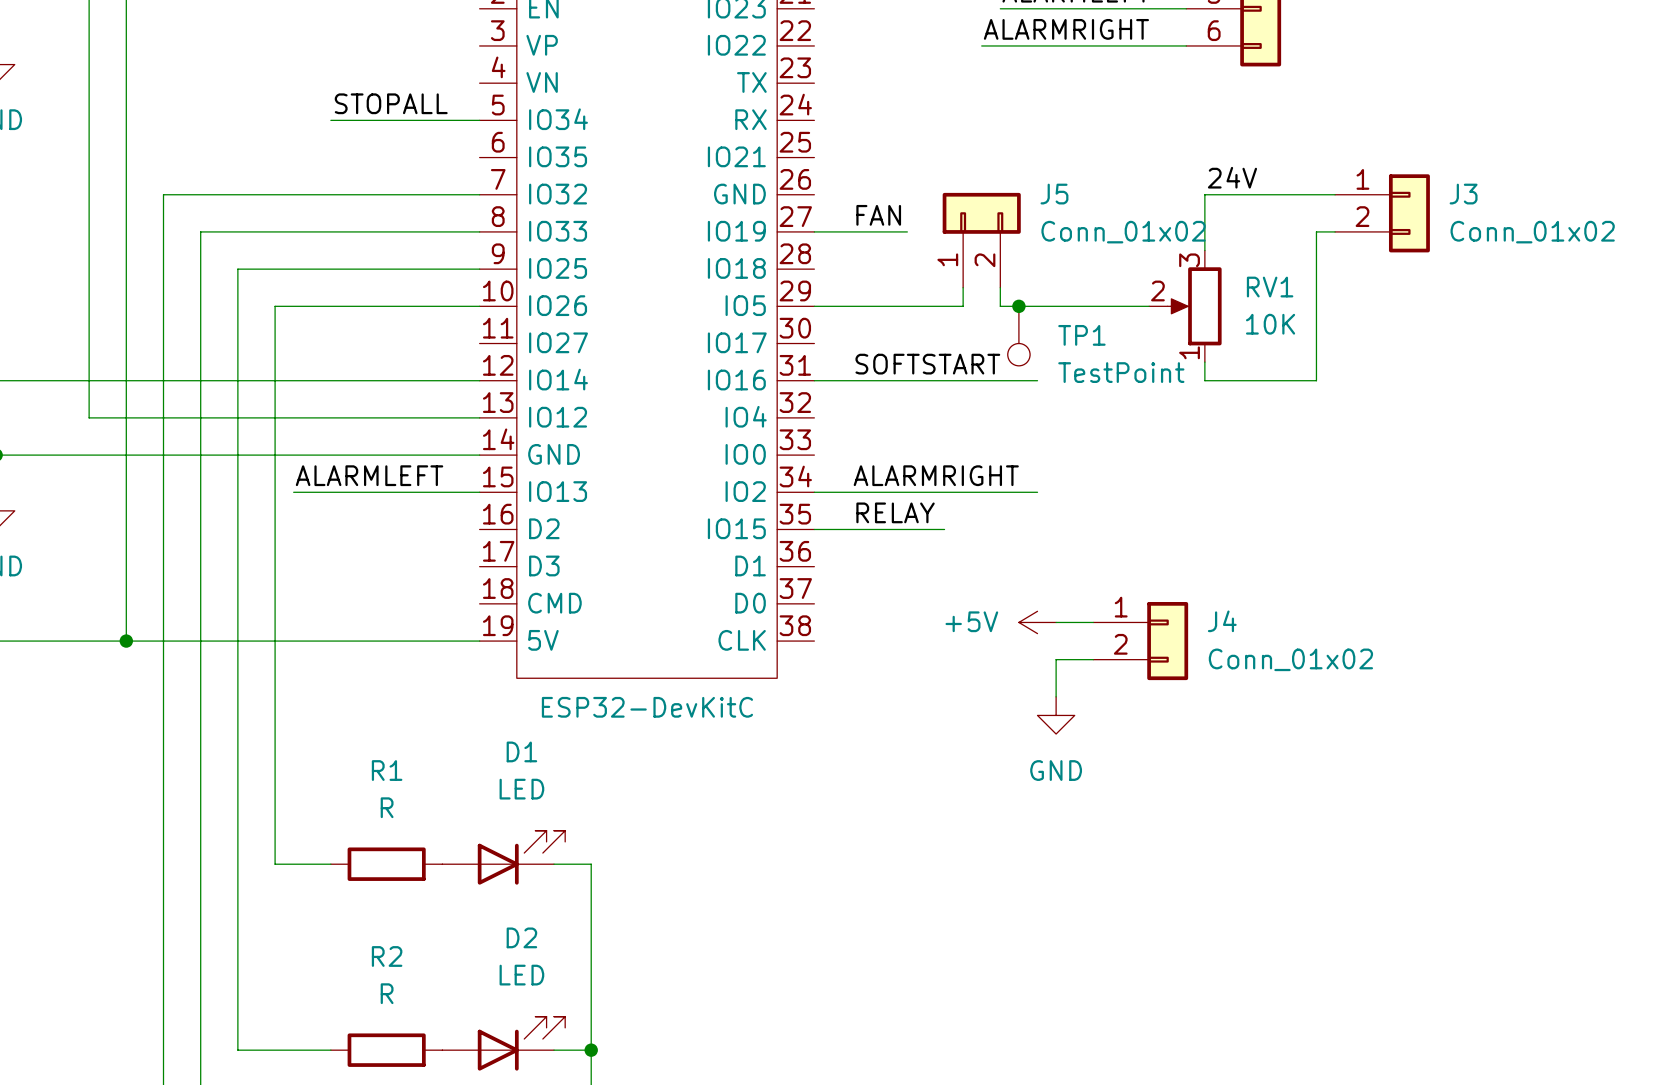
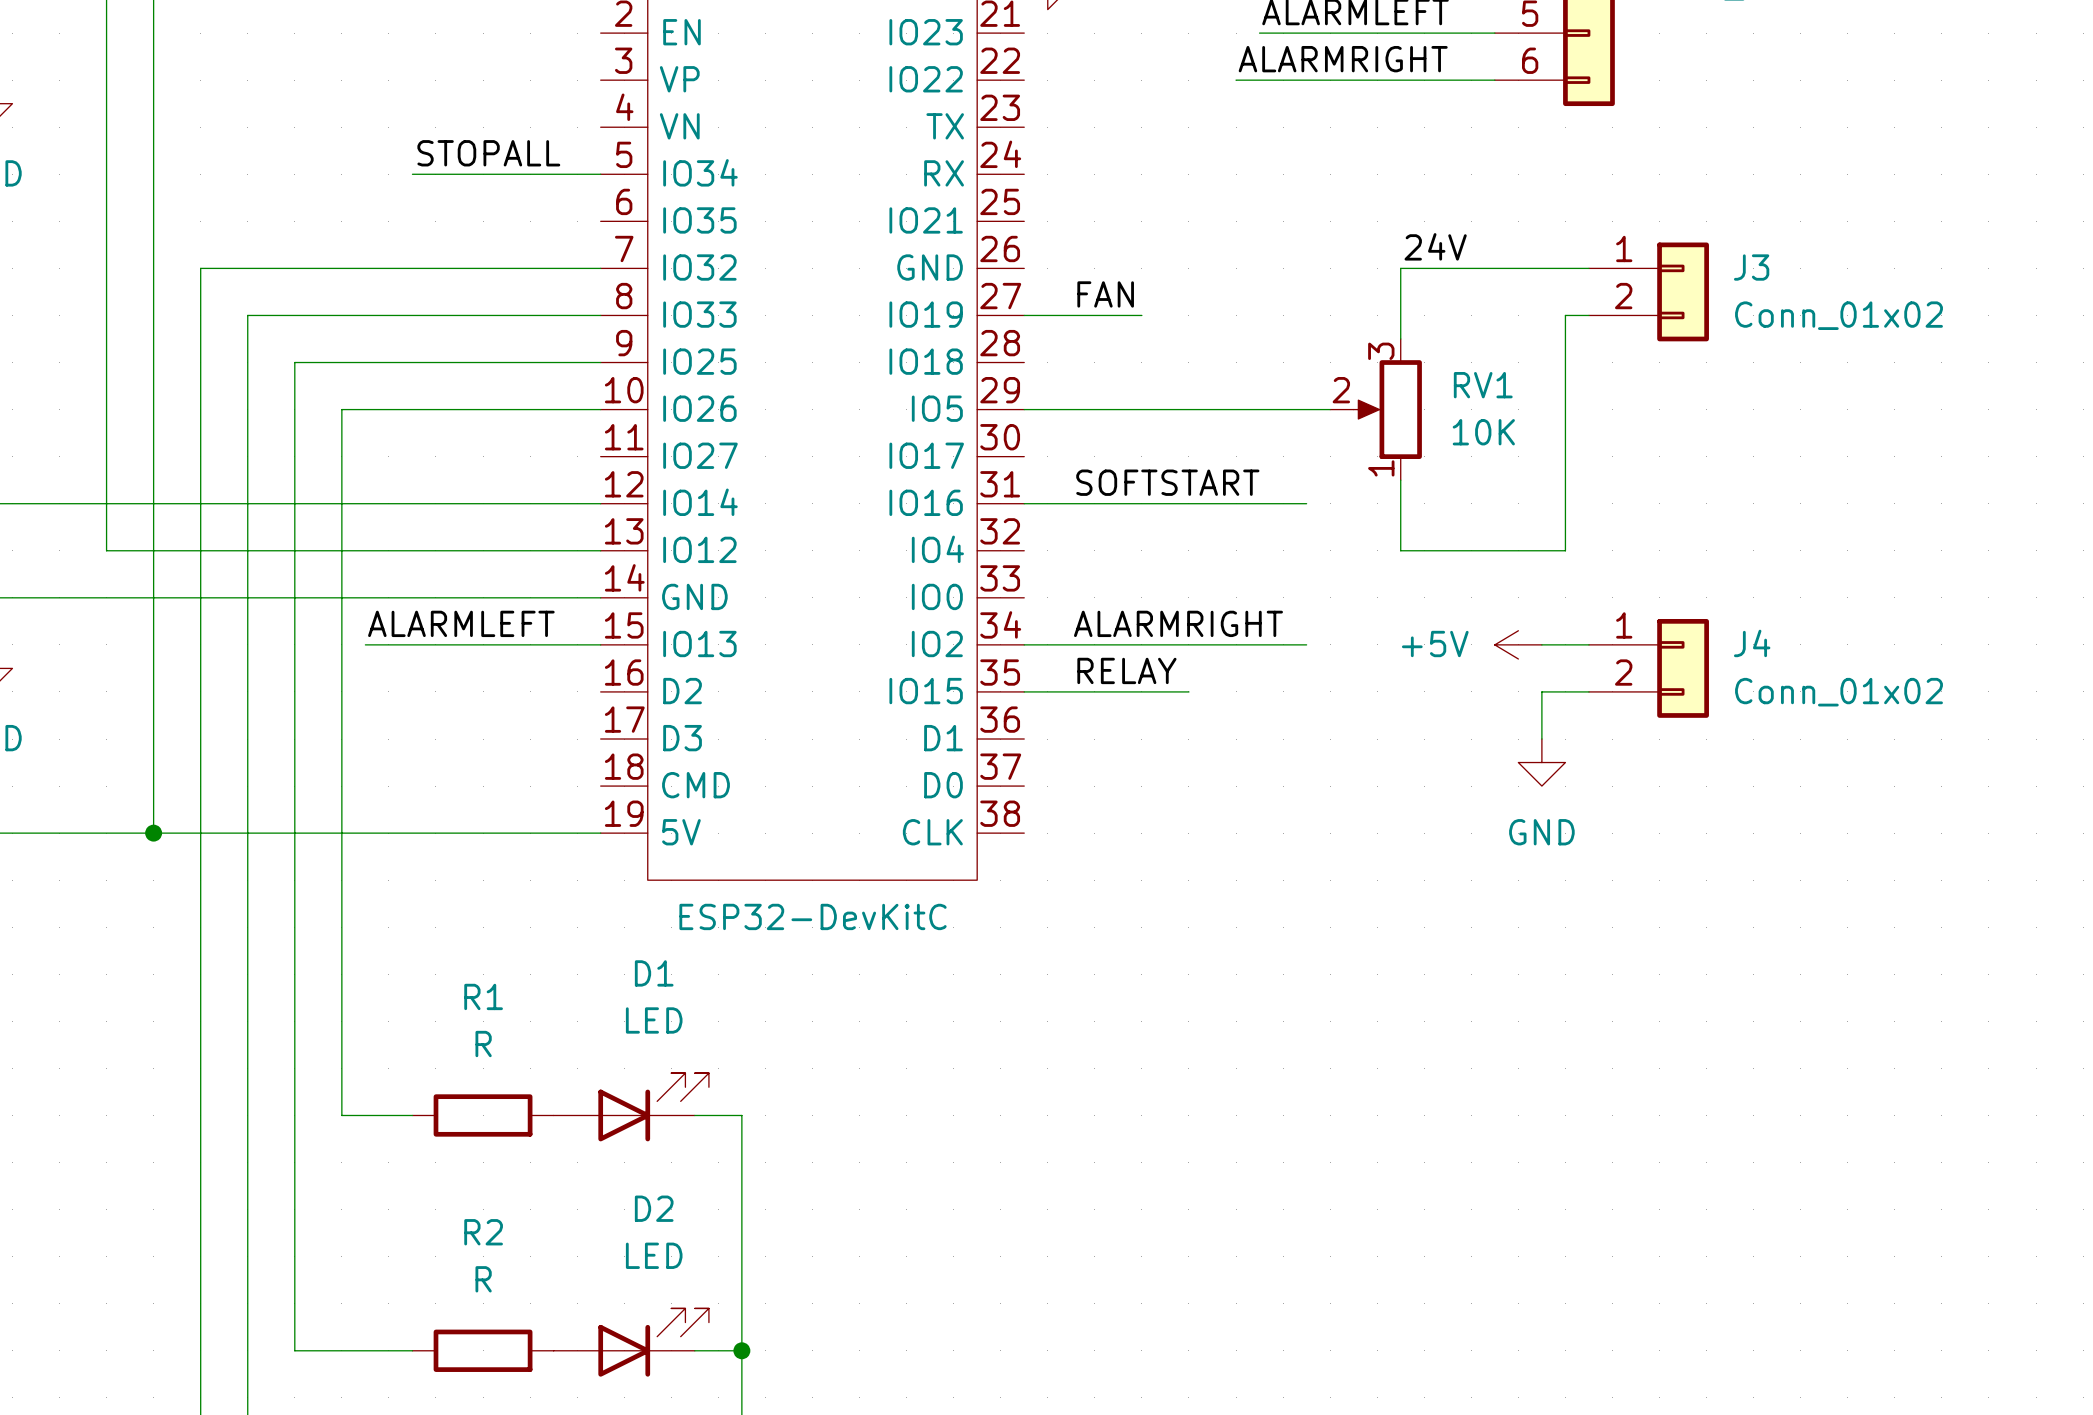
label position: 24V (1232, 177) -> 24V (1435, 246)
wire: (1204, 194) (1204, 250) -> (1518, 268) (1400, 268) (1400, 338)
J3 position: (1382, 213) -> (1648, 291)
wire: none -> (1588, 315) (1565, 315) (1565, 550) (1400, 550) (1400, 480)
wire: (1335, 231) (1316, 231) (1316, 380) (1204, 380) (1204, 362) -> none
J5: Conn_01x02 (981, 240) -> none
wire: (963, 287) (963, 306) -> (1259, 409) (1212, 409)
wire: (1000, 287) (1000, 306) -> none
junction: (1018, 306) -> none
wire: (1056, 306) (1149, 306) -> none
RV1 position: (1185, 306) -> (1376, 409)
TP1: TestPoint (1018, 336) -> none
power symbol position: +5V (1037, 622) -> +5V (1518, 644)
wire: (1056, 622) (1093, 622) -> (1541, 644) (1588, 644)
J4 position: (1140, 641) -> (1648, 668)
wire: (1093, 659) (1056, 659) (1056, 696) -> (1588, 691) (1541, 691) (1541, 739)
power symbol position: GND (1056, 715) -> GND (1541, 762)

